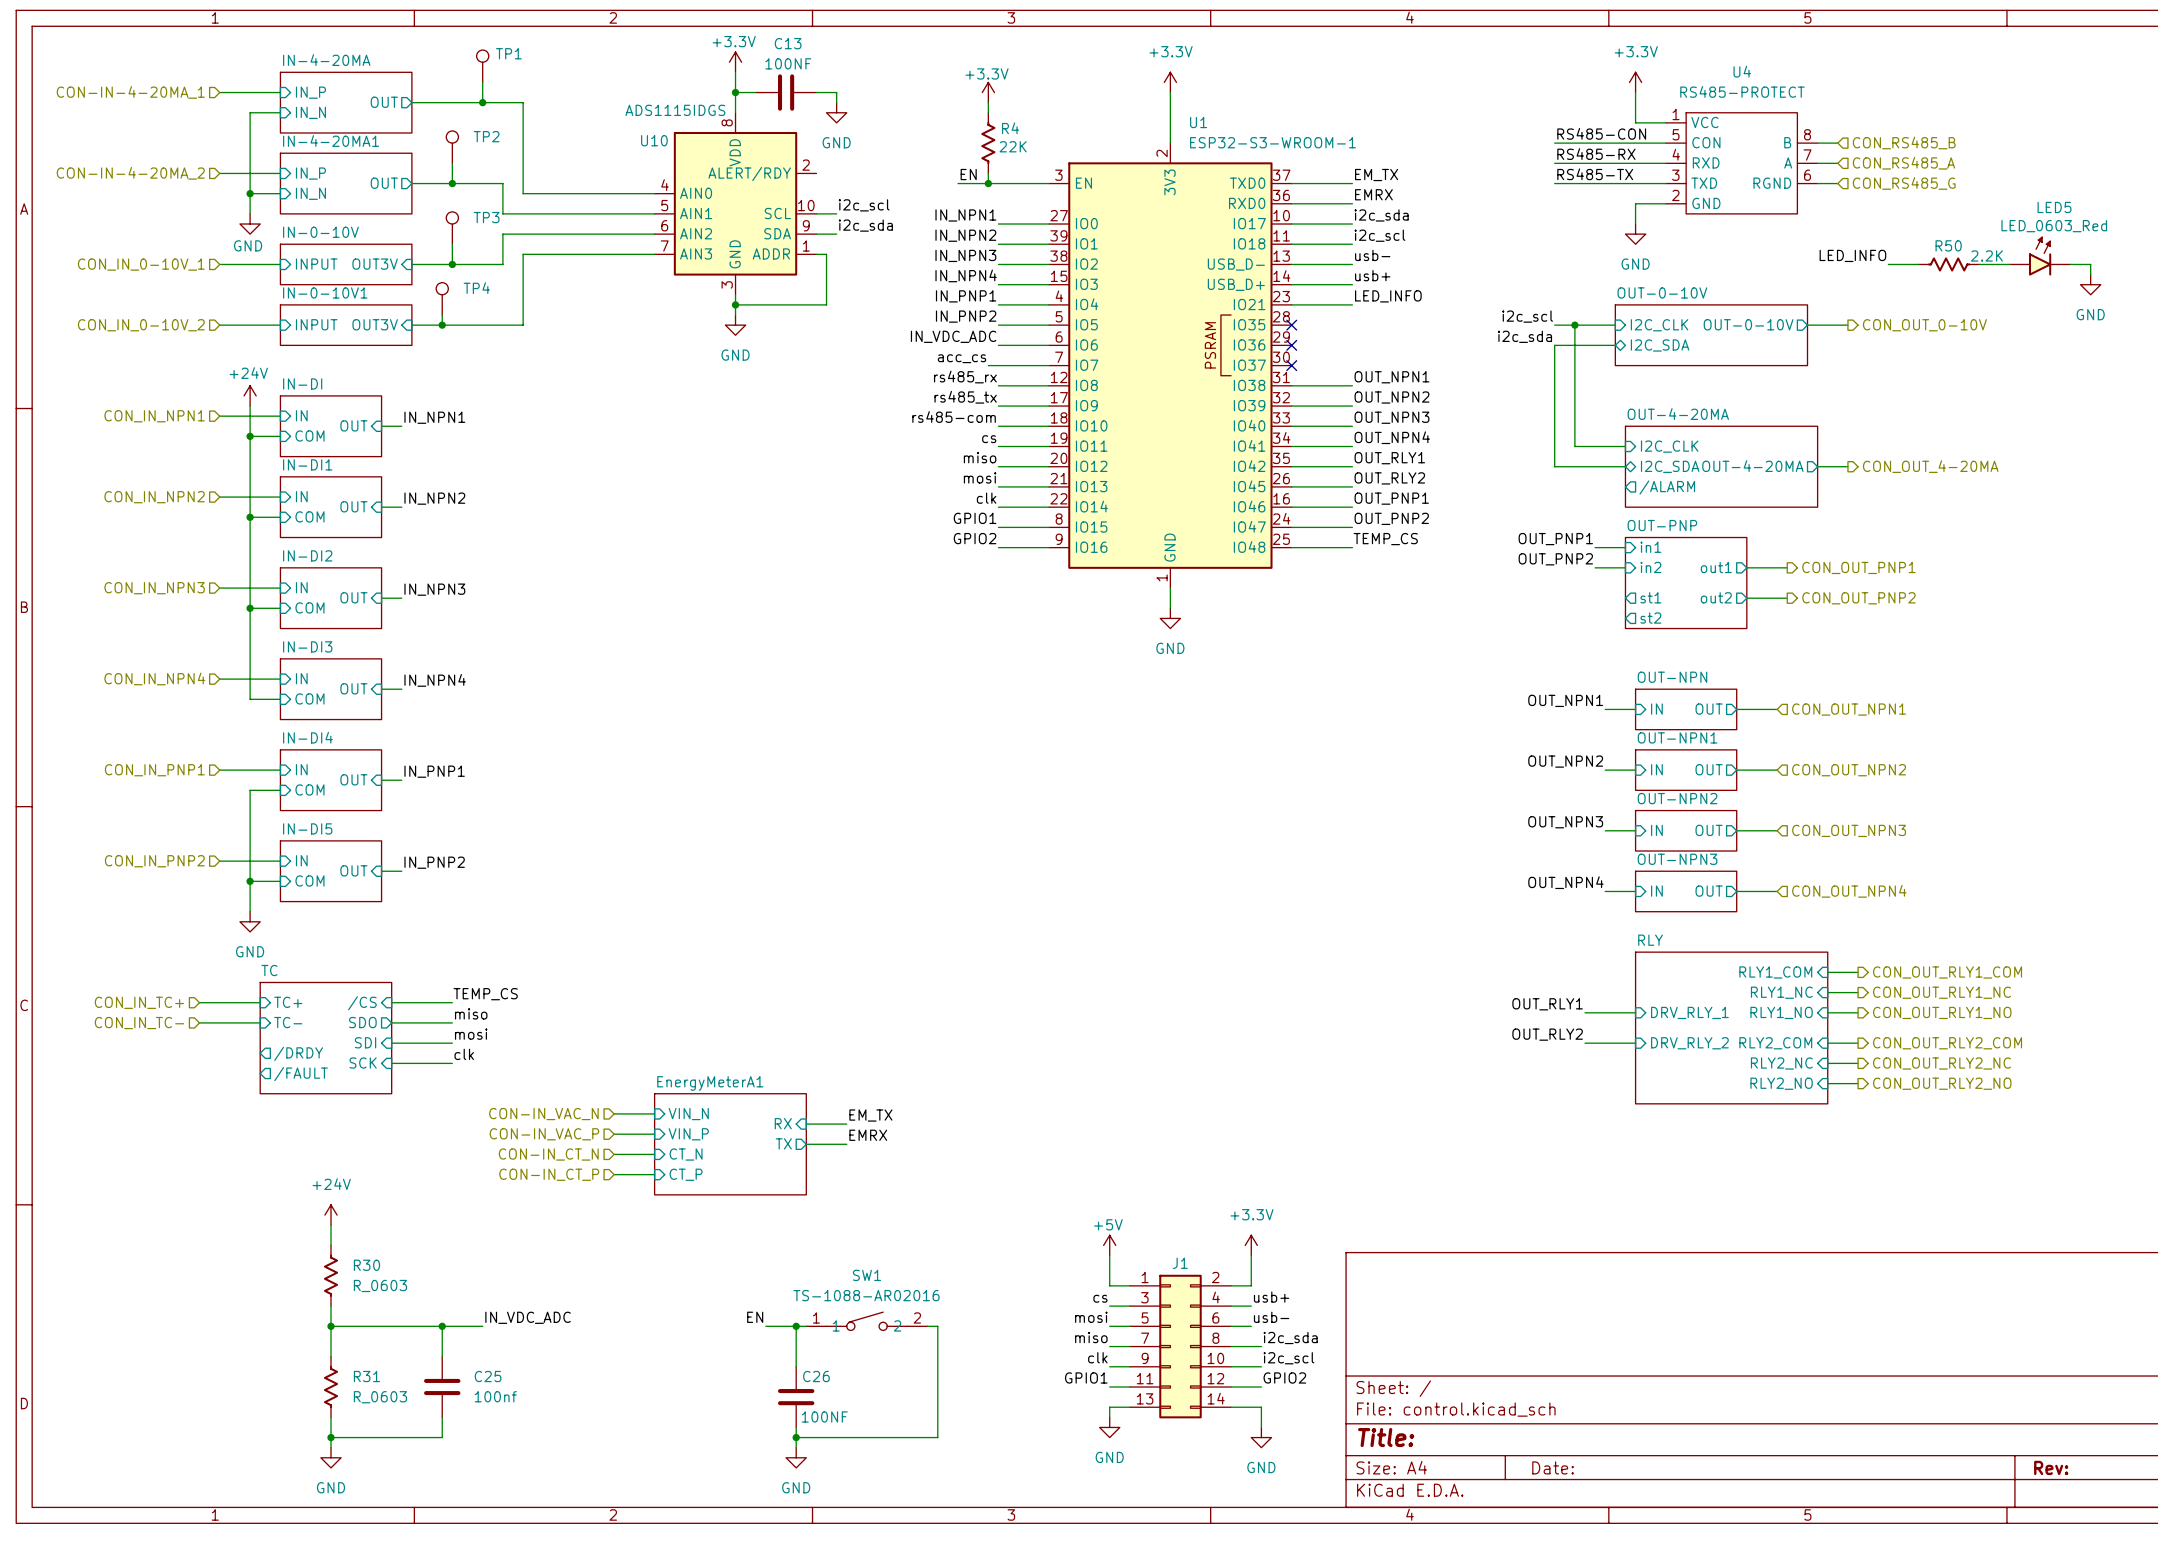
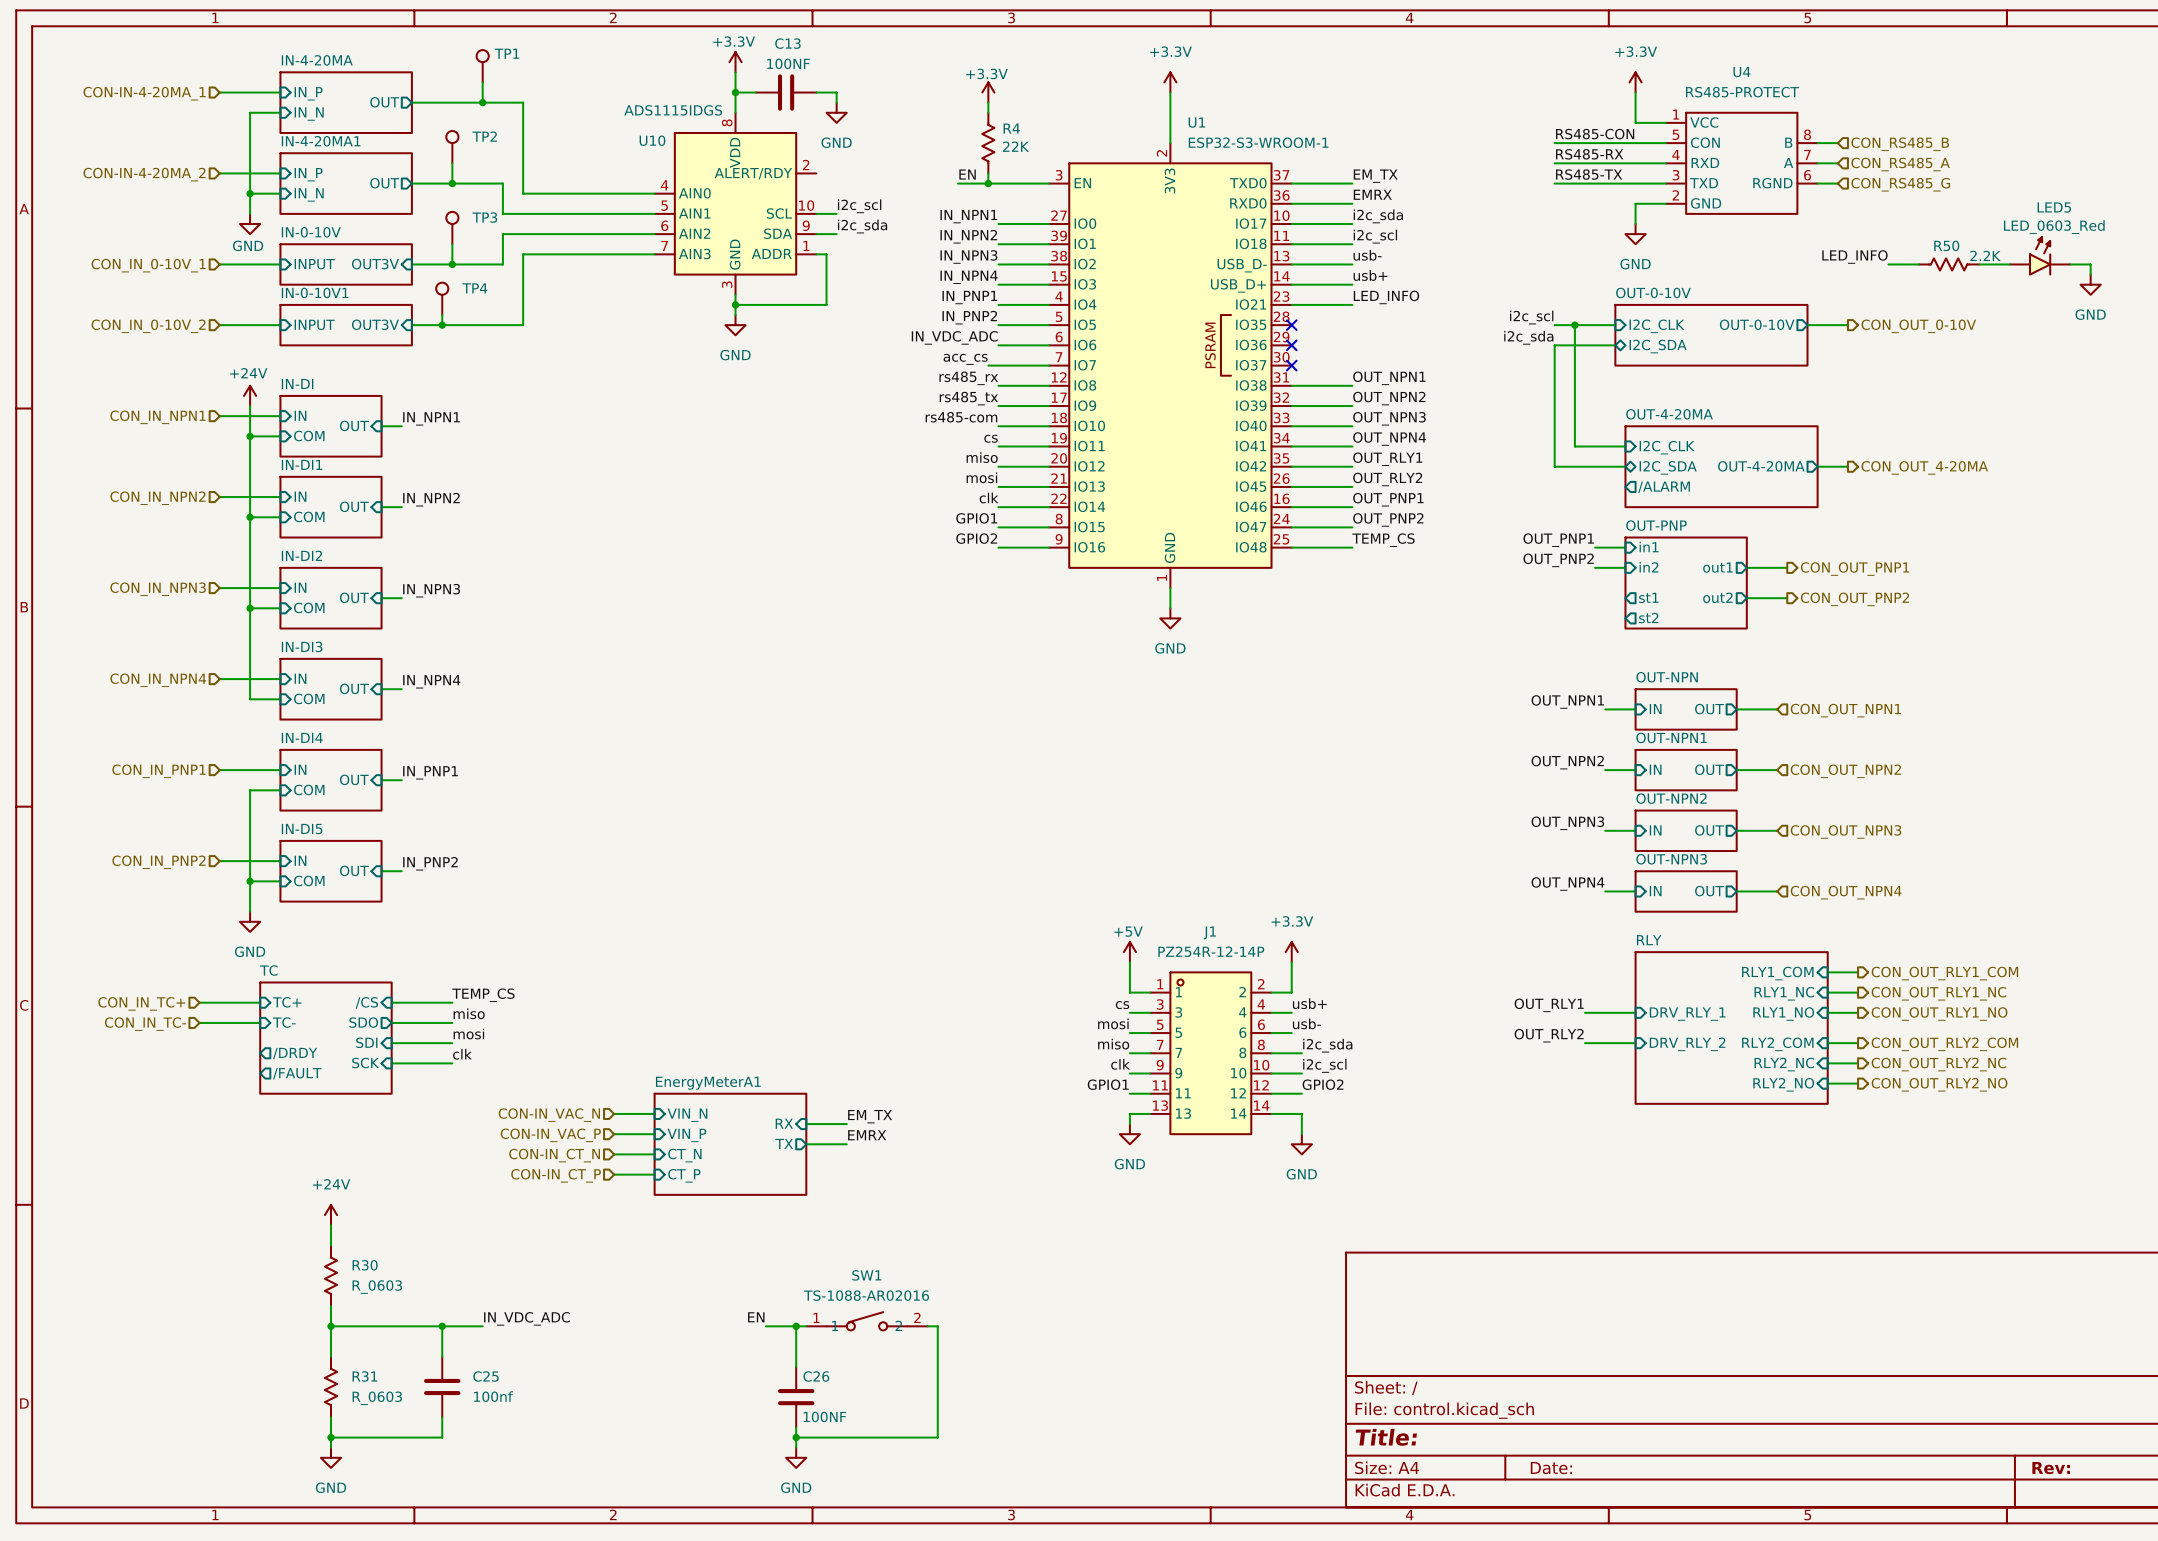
J1 value: none -> PZ254R-12-14P (1211, 951)
power symbol: none -> +5V (1129, 952)
power symbol: none -> +3.3V (1291, 952)
wire: none -> (1129, 962) (1129, 992) (1150, 992)
wire: none -> (1291, 962) (1291, 992) (1271, 992)
label: none -> usb+ (1309, 1003)
label: none -> cs (1122, 1005)
wire: none -> (1129, 1012) (1150, 1012)
wire: none -> (1271, 1012) (1291, 1012)
label: none -> mosi (1113, 1023)
label: none -> usb- (1306, 1023)
wire: none -> (1129, 1033) (1150, 1033)
wire: none -> (1271, 1033) (1291, 1033)
label: none -> miso (1113, 1044)
label: none -> i2c_sda (1327, 1045)
wire: none -> (1129, 1053) (1150, 1053)
wire: none -> (1271, 1053) (1301, 1053)
label: none -> clk (1120, 1064)
label: none -> i2c_scl (1324, 1065)
wire: none -> (1129, 1073) (1150, 1073)
wire: none -> (1271, 1073) (1301, 1073)
label: none -> GPIO1 (1108, 1084)
label: none -> GPIO2 (1323, 1084)
wire: none -> (1129, 1093) (1150, 1093)
wire: none -> (1271, 1093) (1301, 1093)
wire: none -> (1150, 1113) (1129, 1113) (1129, 1124)
wire: none -> (1271, 1113) (1301, 1113) (1301, 1134)
power symbol: none -> GND (1129, 1134)
power symbol: none -> GND (1301, 1144)
power symbol: +5V (1109, 1245) -> none
power symbol: +3.3V (1251, 1245) -> none
wire: (1109, 1255) (1109, 1285) (1129, 1285) -> none
wire: (1251, 1255) (1251, 1285) (1231, 1285) -> none
J1 name position: J1 (1180, 1263) -> J1 (1209, 932)
J1 symbol: [1129, 1274, 1232, 1419] -> [1150, 972, 1272, 1135]
label: usb+ (1271, 1297) -> none
label: cs (1100, 1298) -> none
wire: (1109, 1306) (1129, 1306) -> none
wire: (1231, 1306) (1251, 1306) -> none
label: mosi (1091, 1317) -> none
label: usb- (1271, 1317) -> none
wire: (1109, 1326) (1129, 1326) -> none
wire: (1231, 1326) (1251, 1326) -> none
label: miso (1091, 1337) -> none
label: i2c_sda (1290, 1338) -> none
wire: (1109, 1346) (1129, 1346) -> none
wire: (1231, 1346) (1261, 1346) -> none
label: clk (1097, 1357) -> none
label: i2c_scl (1288, 1358) -> none
wire: (1109, 1366) (1129, 1366) -> none
wire: (1231, 1366) (1261, 1366) -> none
label: GPIO1 (1086, 1377) -> none
label: GPIO2 (1284, 1377) -> none
wire: (1109, 1387) (1129, 1387) -> none
wire: (1231, 1387) (1261, 1387) -> none
wire: (1129, 1407) (1109, 1407) (1109, 1417) -> none
wire: (1231, 1407) (1261, 1407) (1261, 1427) -> none
power symbol: GND (1109, 1427) -> none
power symbol: GND (1261, 1437) -> none

